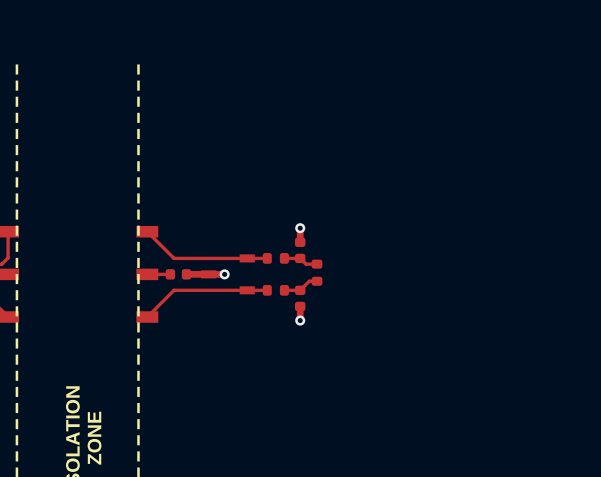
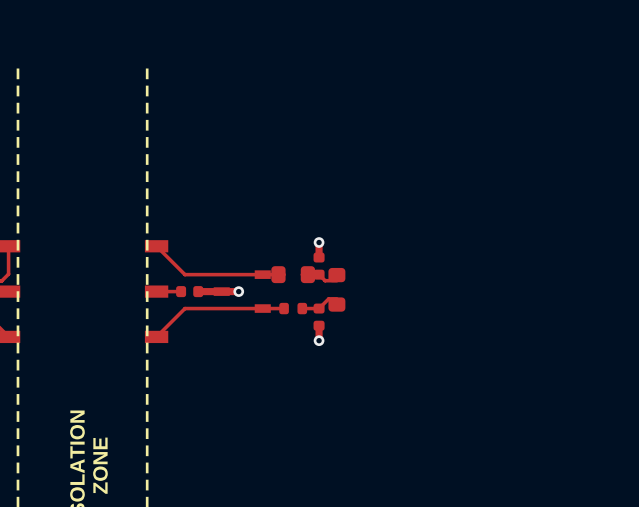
part footprint: [262, 253, 289, 264] -> [271, 266, 316, 284]
part footprint: [311, 259, 323, 286] -> [328, 267, 346, 312]

